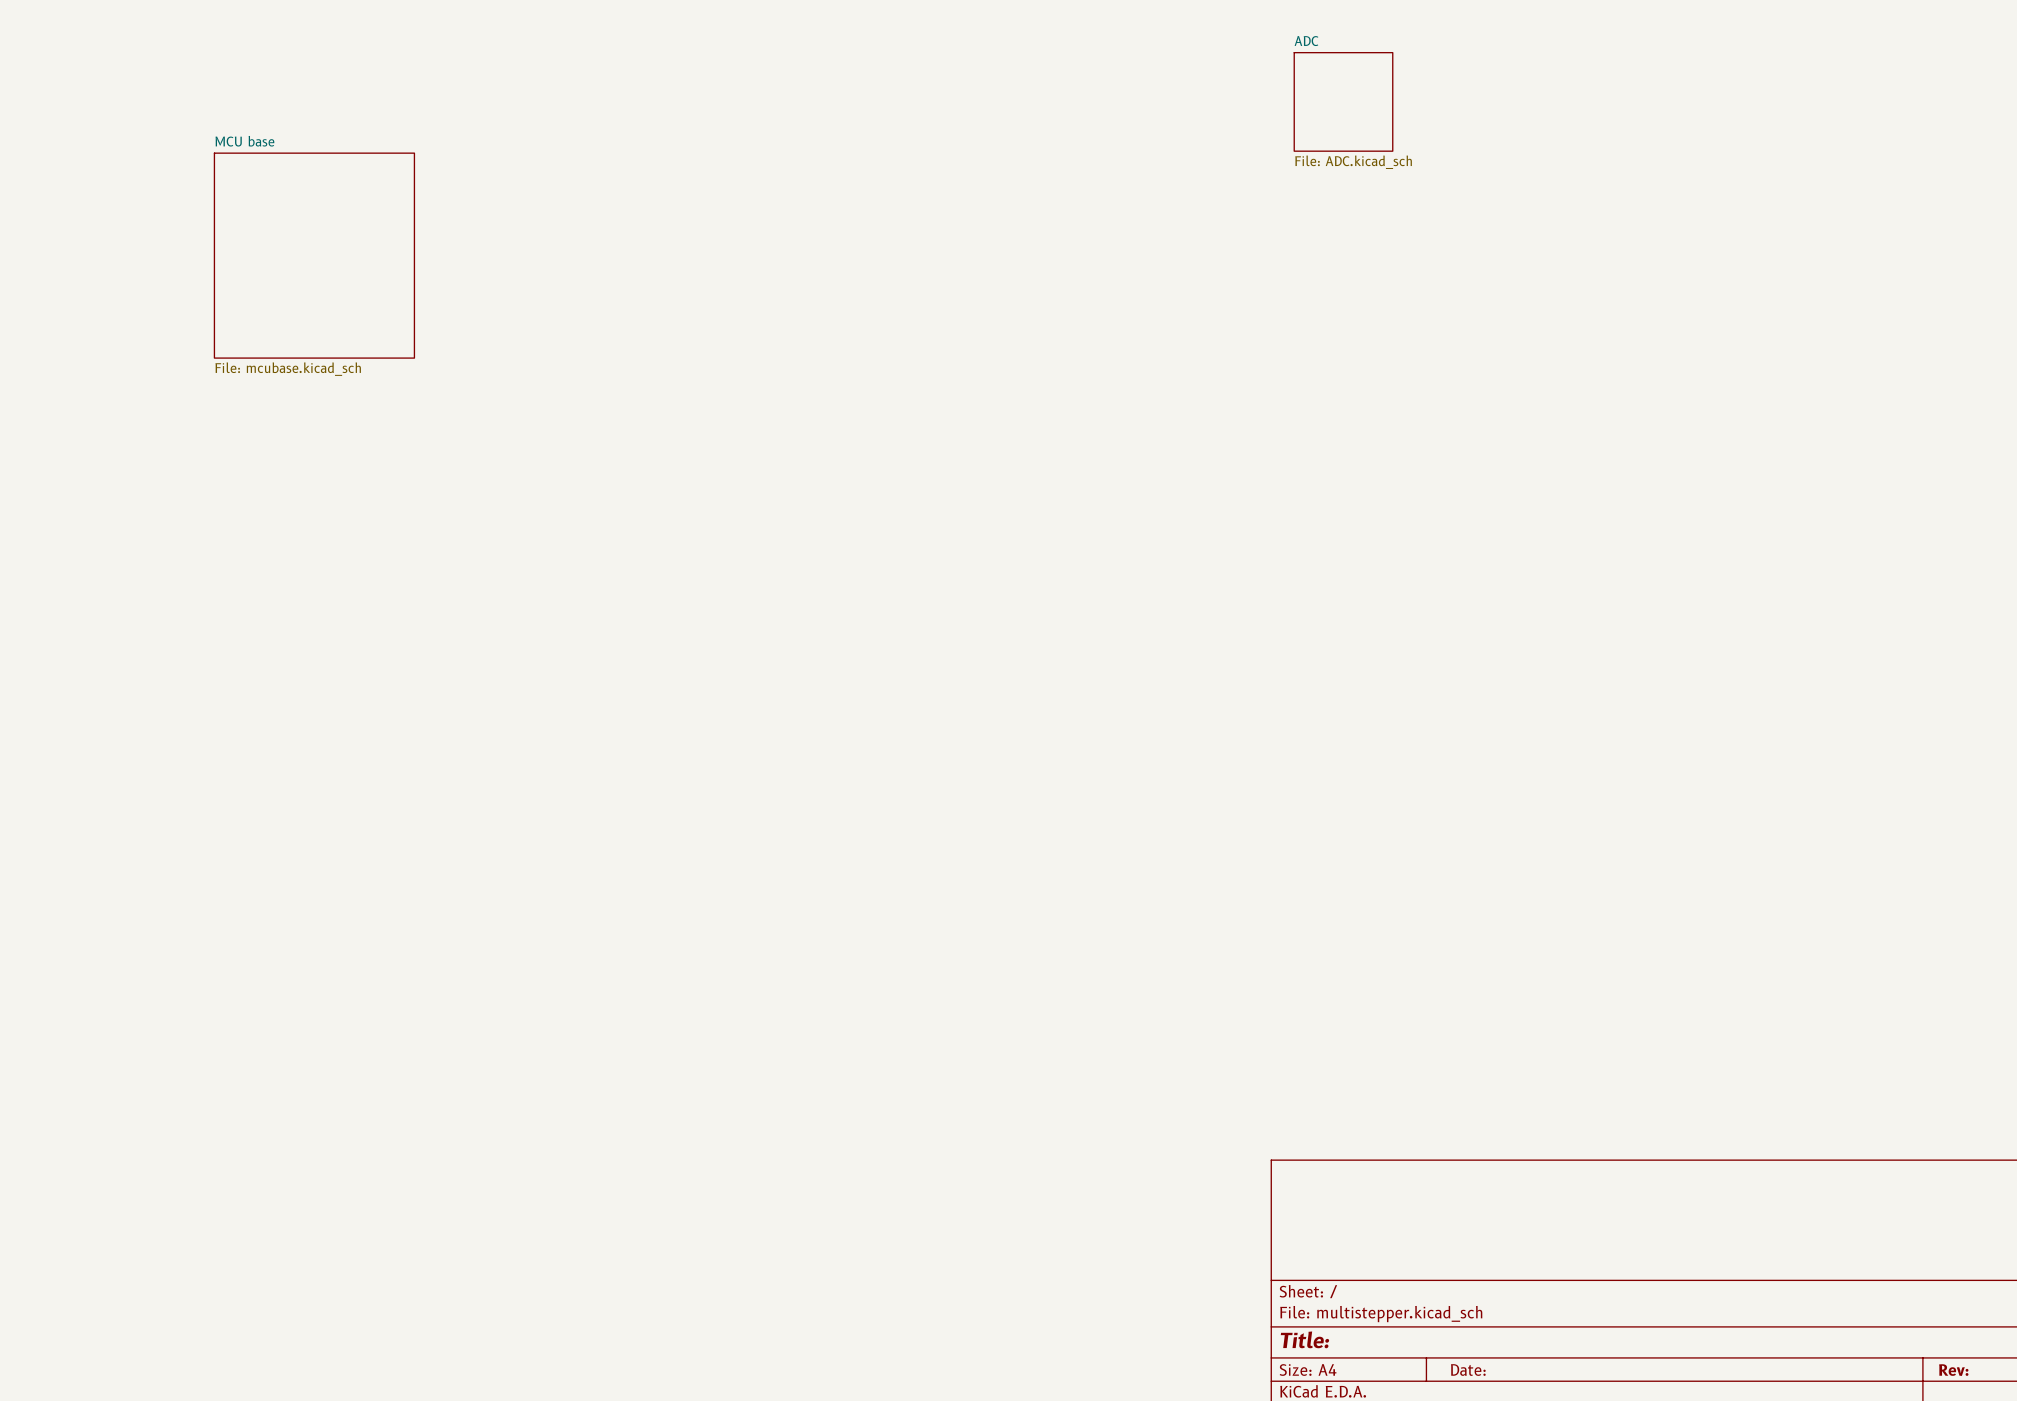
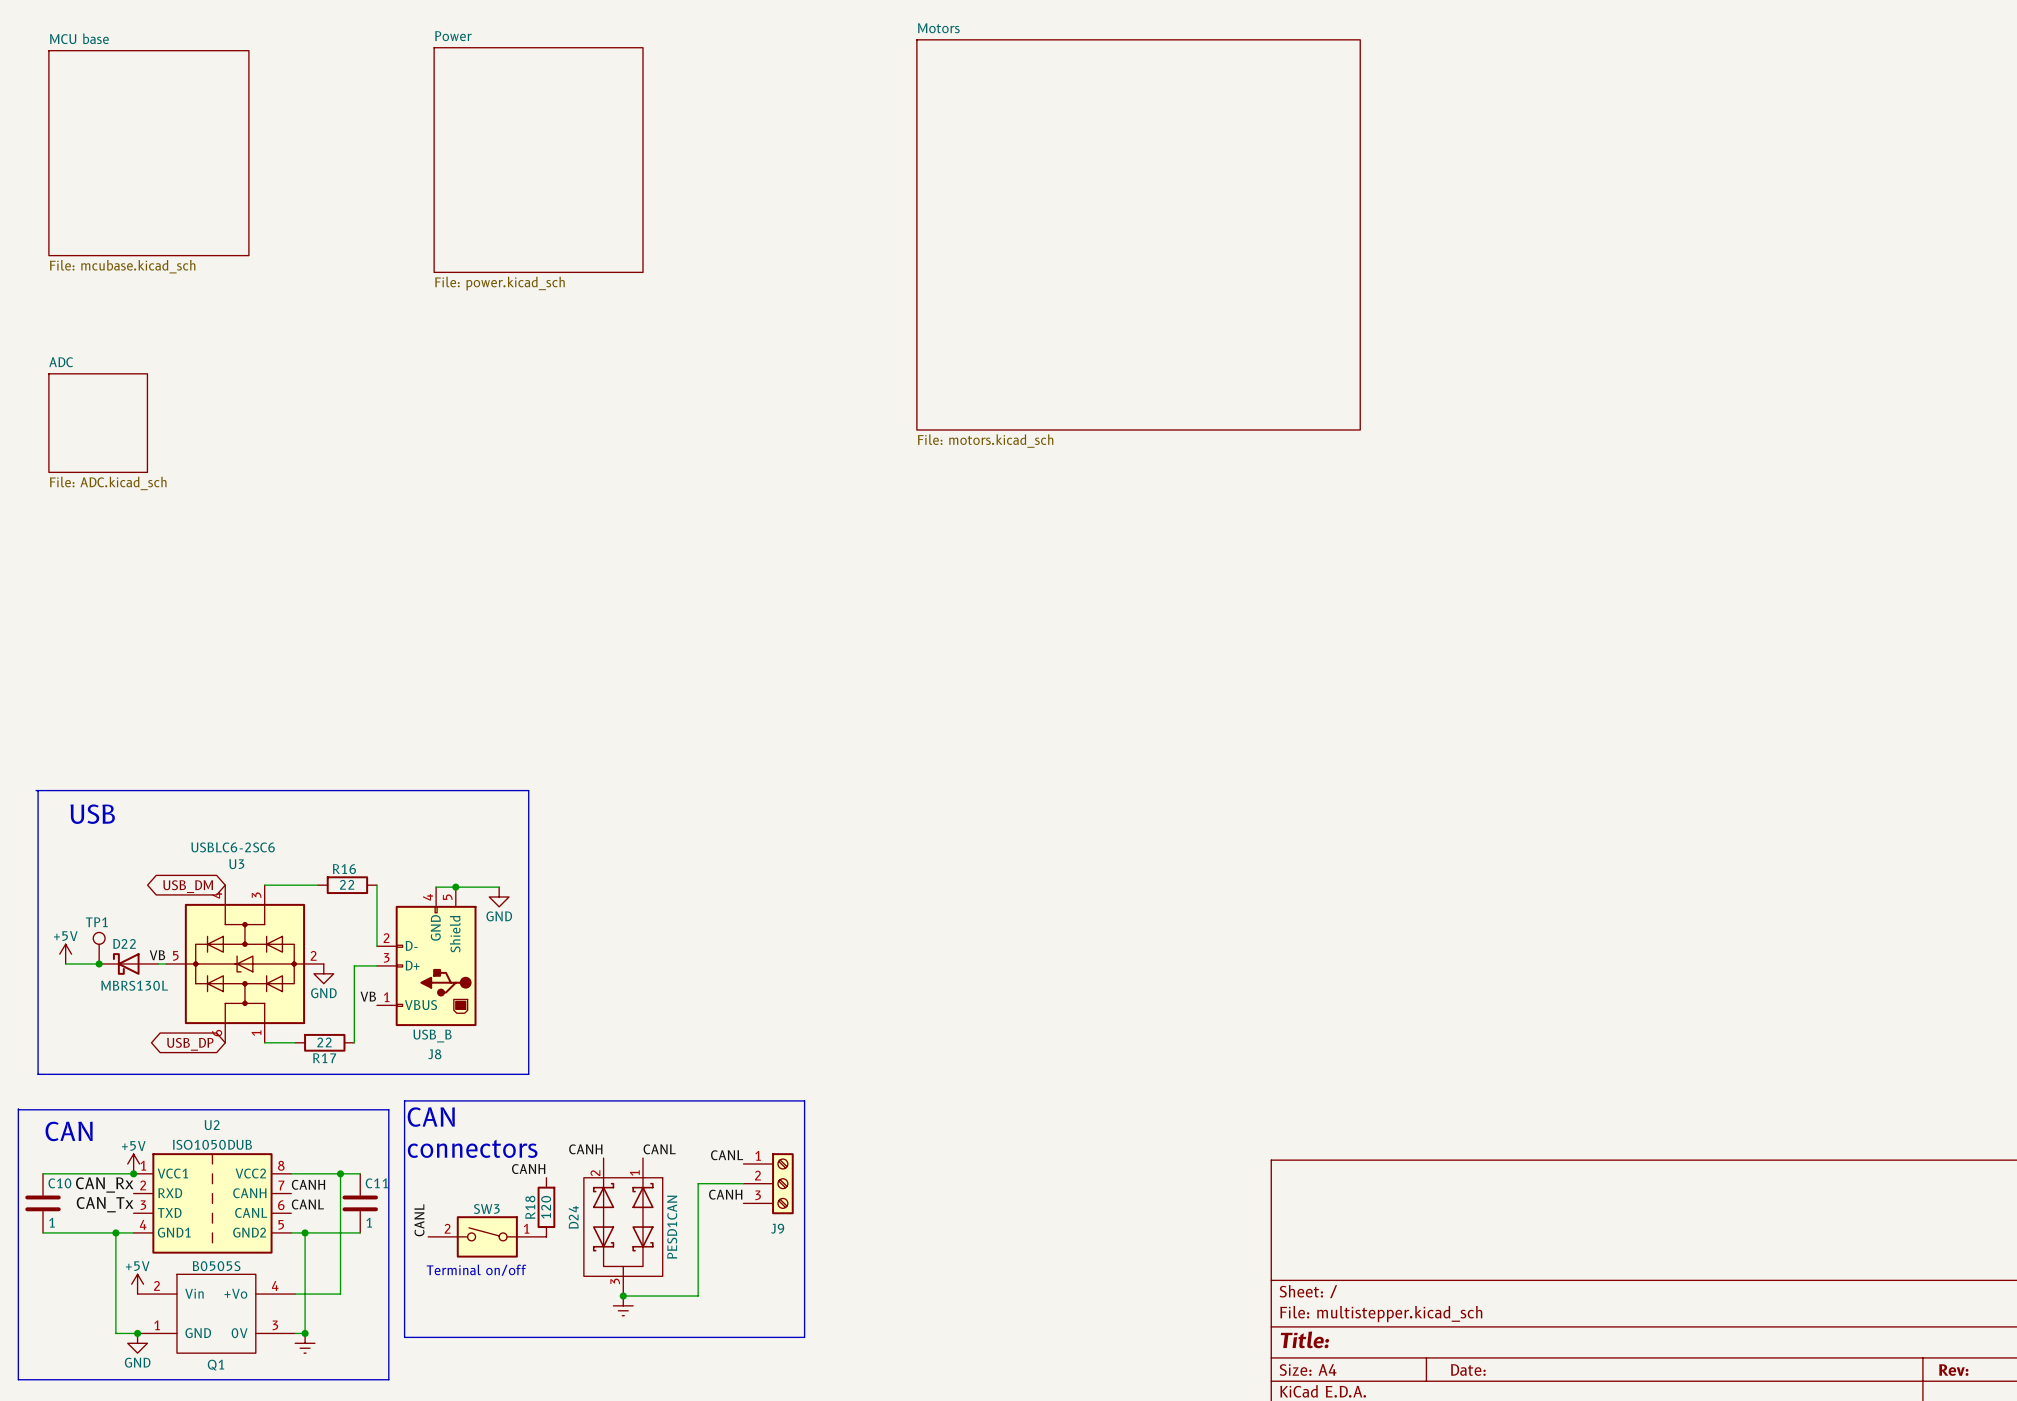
sheet ADC: File: ADC.kicad_sch (1343, 101) -> none
sheet MCU base: none -> File: mcubase.kicad_sch (148, 153)
sheet Power: none -> File: power.kicad_sch (538, 160)
sheet Motors: none -> File: motors.kicad_sch (1138, 234)
sheet MCU base: File: mcubase.kicad_sch (314, 255) -> none
sheet ADC: none -> File: ADC.kicad_sch (98, 423)
line: none -> (36, 790) (528, 790) (528, 1074) (38, 1074) (38, 790)
text: none -> USB (92, 814)
wire: none -> (264, 885) (317, 885)
R16: none -> 22 (347, 885)
wire: none -> (376, 885) (376, 946)
global label: none -> USB_DM (188, 886)
wire: none -> (436, 887) (499, 887)
junction: none -> (455, 887)
power symbol: none -> GND (499, 896)
TP1: none -> (99, 948)
power symbol: none -> +5V (65, 954)
label: none -> VB (157, 955)
J8: none -> USB_B (426, 956)
wire: none -> (65, 963) (99, 963)
junction: none -> (99, 963)
D22: none -> MBRS130L (128, 963)
wire: none -> (158, 963) (166, 963)
U3: none -> USBLC6-2SC6 (244, 963)
wire: none -> (376, 965) (354, 965) (354, 1042)
power symbol: none -> GND (323, 973)
label: none -> VB (368, 996)
wire: none -> (264, 1042) (295, 1042)
R17: none -> 22 (324, 1042)
global label: none -> USB_DP (190, 1044)
line: none -> (404, 1100) (804, 1100) (804, 1337) (404, 1337) (404, 1100)
line: none -> (18, 1108) (18, 1379) (388, 1379) (388, 1109) (18, 1109)
text: none -> CAN (431, 1117)
text: none -> CAN (69, 1131)
text: none -> connectors (472, 1148)
label: none -> CANH (585, 1149)
label: none -> CANL (659, 1149)
label: none -> CANL (727, 1155)
power symbol: none -> +5V (133, 1163)
label: none -> CANH (528, 1169)
wire: none -> (42, 1173) (133, 1173)
junction: none -> (133, 1173)
wire: none -> (291, 1173) (360, 1173)
wire: none -> (340, 1173) (340, 1294) (295, 1294)
junction: none -> (340, 1173)
wire: none -> (743, 1183) (698, 1183) (698, 1296) (623, 1296)
J9: none -> (768, 1183)
label: none -> CANH (308, 1184)
label: none -> CAN_Rx (104, 1185)
label: none -> CANH (725, 1194)
C10: none -> 1 (42, 1203)
U2: none -> ISO1050DUB (212, 1203)
C11: none -> 1 (360, 1203)
label: none -> CAN_Tx (105, 1204)
label: none -> CANL (307, 1204)
R18: none -> 120 (546, 1207)
label: none -> CANL (419, 1220)
D24: none -> PESD1CAN (623, 1227)
wire: none -> (42, 1232) (133, 1232)
wire: none -> (115, 1232) (115, 1333) (137, 1333)
junction: none -> (115, 1232)
wire: none -> (291, 1232) (360, 1232)
wire: none -> (305, 1232) (305, 1333) (295, 1333)
junction: none -> (305, 1232)
SW3: none -> (487, 1236)
text: none -> Terminal on/off (476, 1270)
power symbol: none -> +5V (137, 1284)
junction: none -> (623, 1296)
power symbol: none -> (623, 1305)
Q1: none -> B0505S (216, 1313)
junction: none -> (137, 1333)
junction: none -> (305, 1333)
power symbol: none -> GND (137, 1343)
power symbol: none -> (305, 1343)

